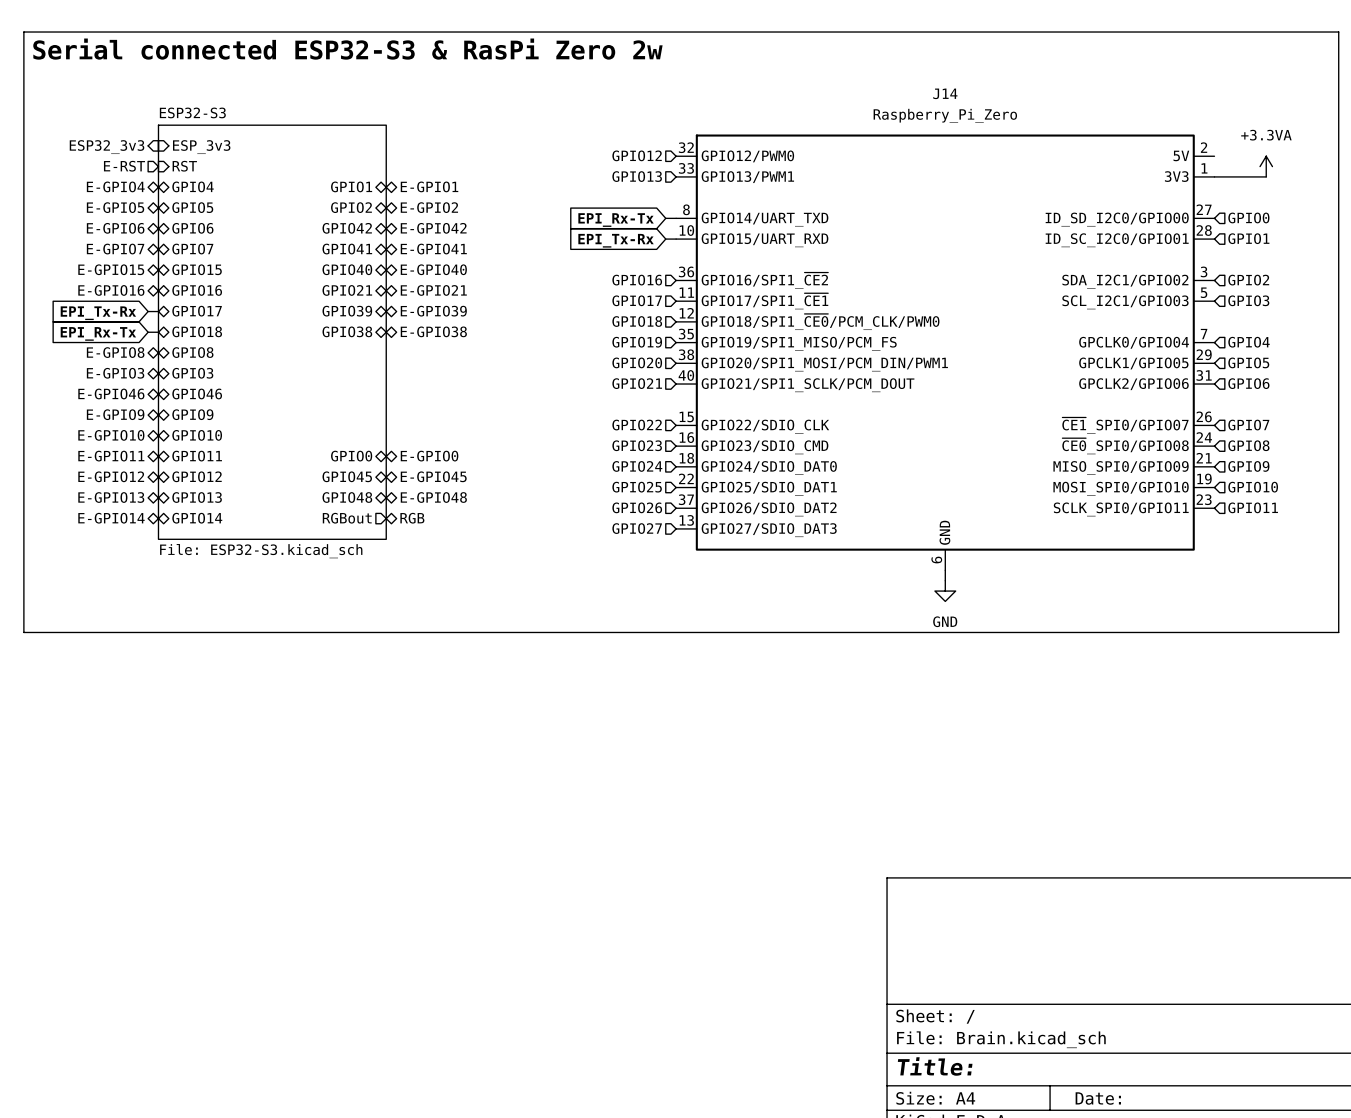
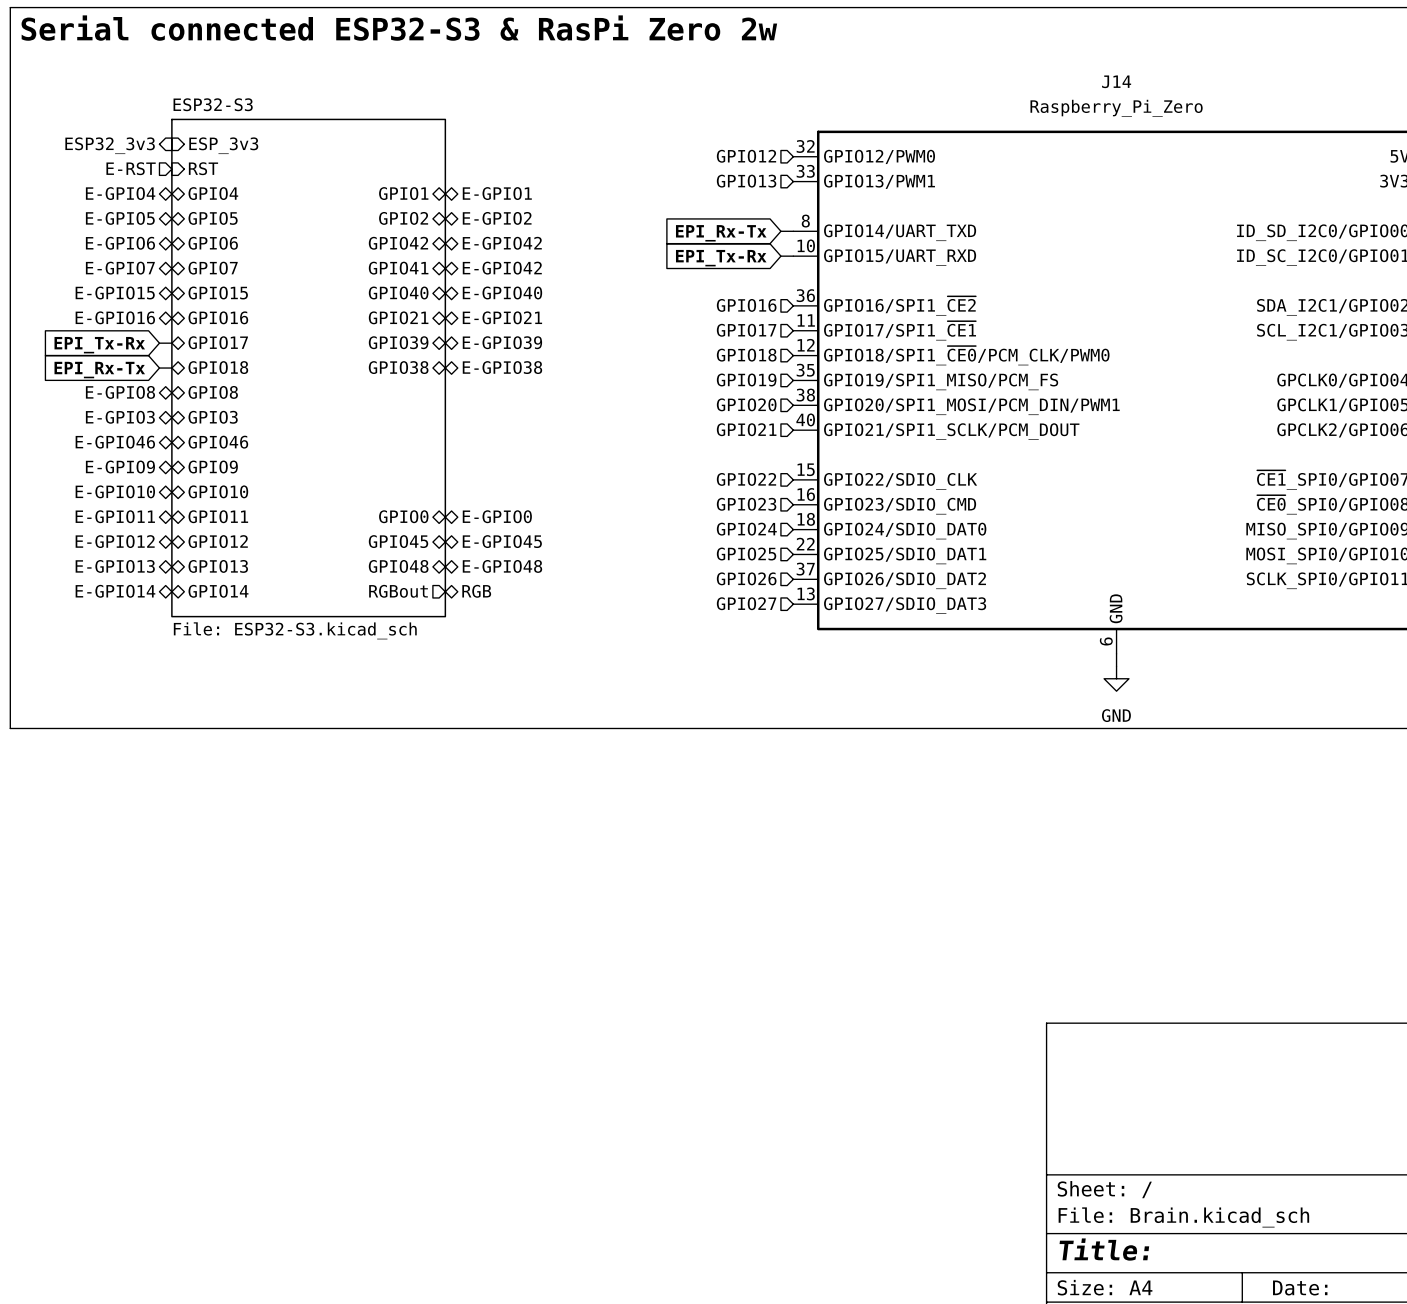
hierarchical label: E-GPIO41 (433, 249) -> E-GPIO42 (502, 268)

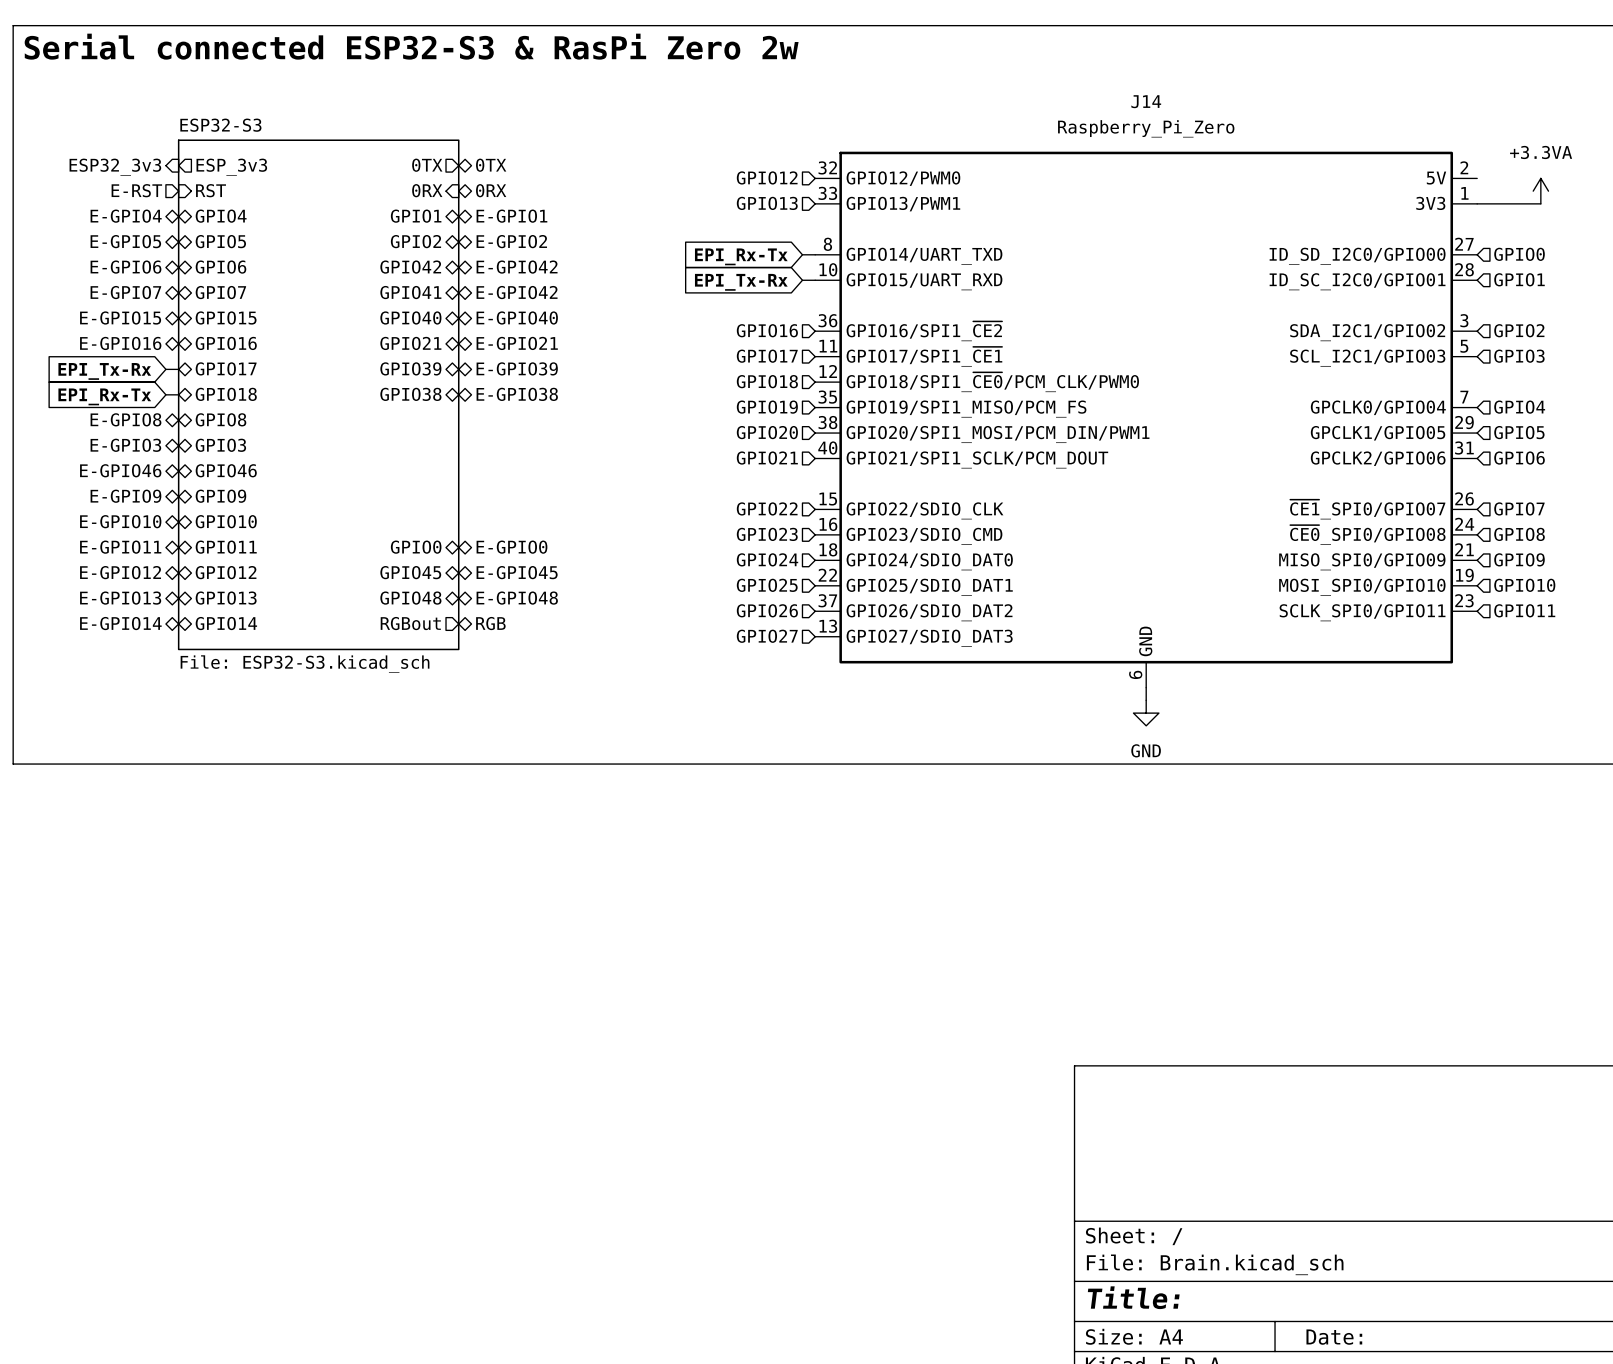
sheet pin: none -> 0TX (427, 165)
hierarchical label: none -> 0TX (491, 165)
sheet pin shape: input (223, 145) -> output (231, 167)
sheet pin: none -> 0RX (427, 190)
hierarchical label: none -> 0RX (491, 190)

